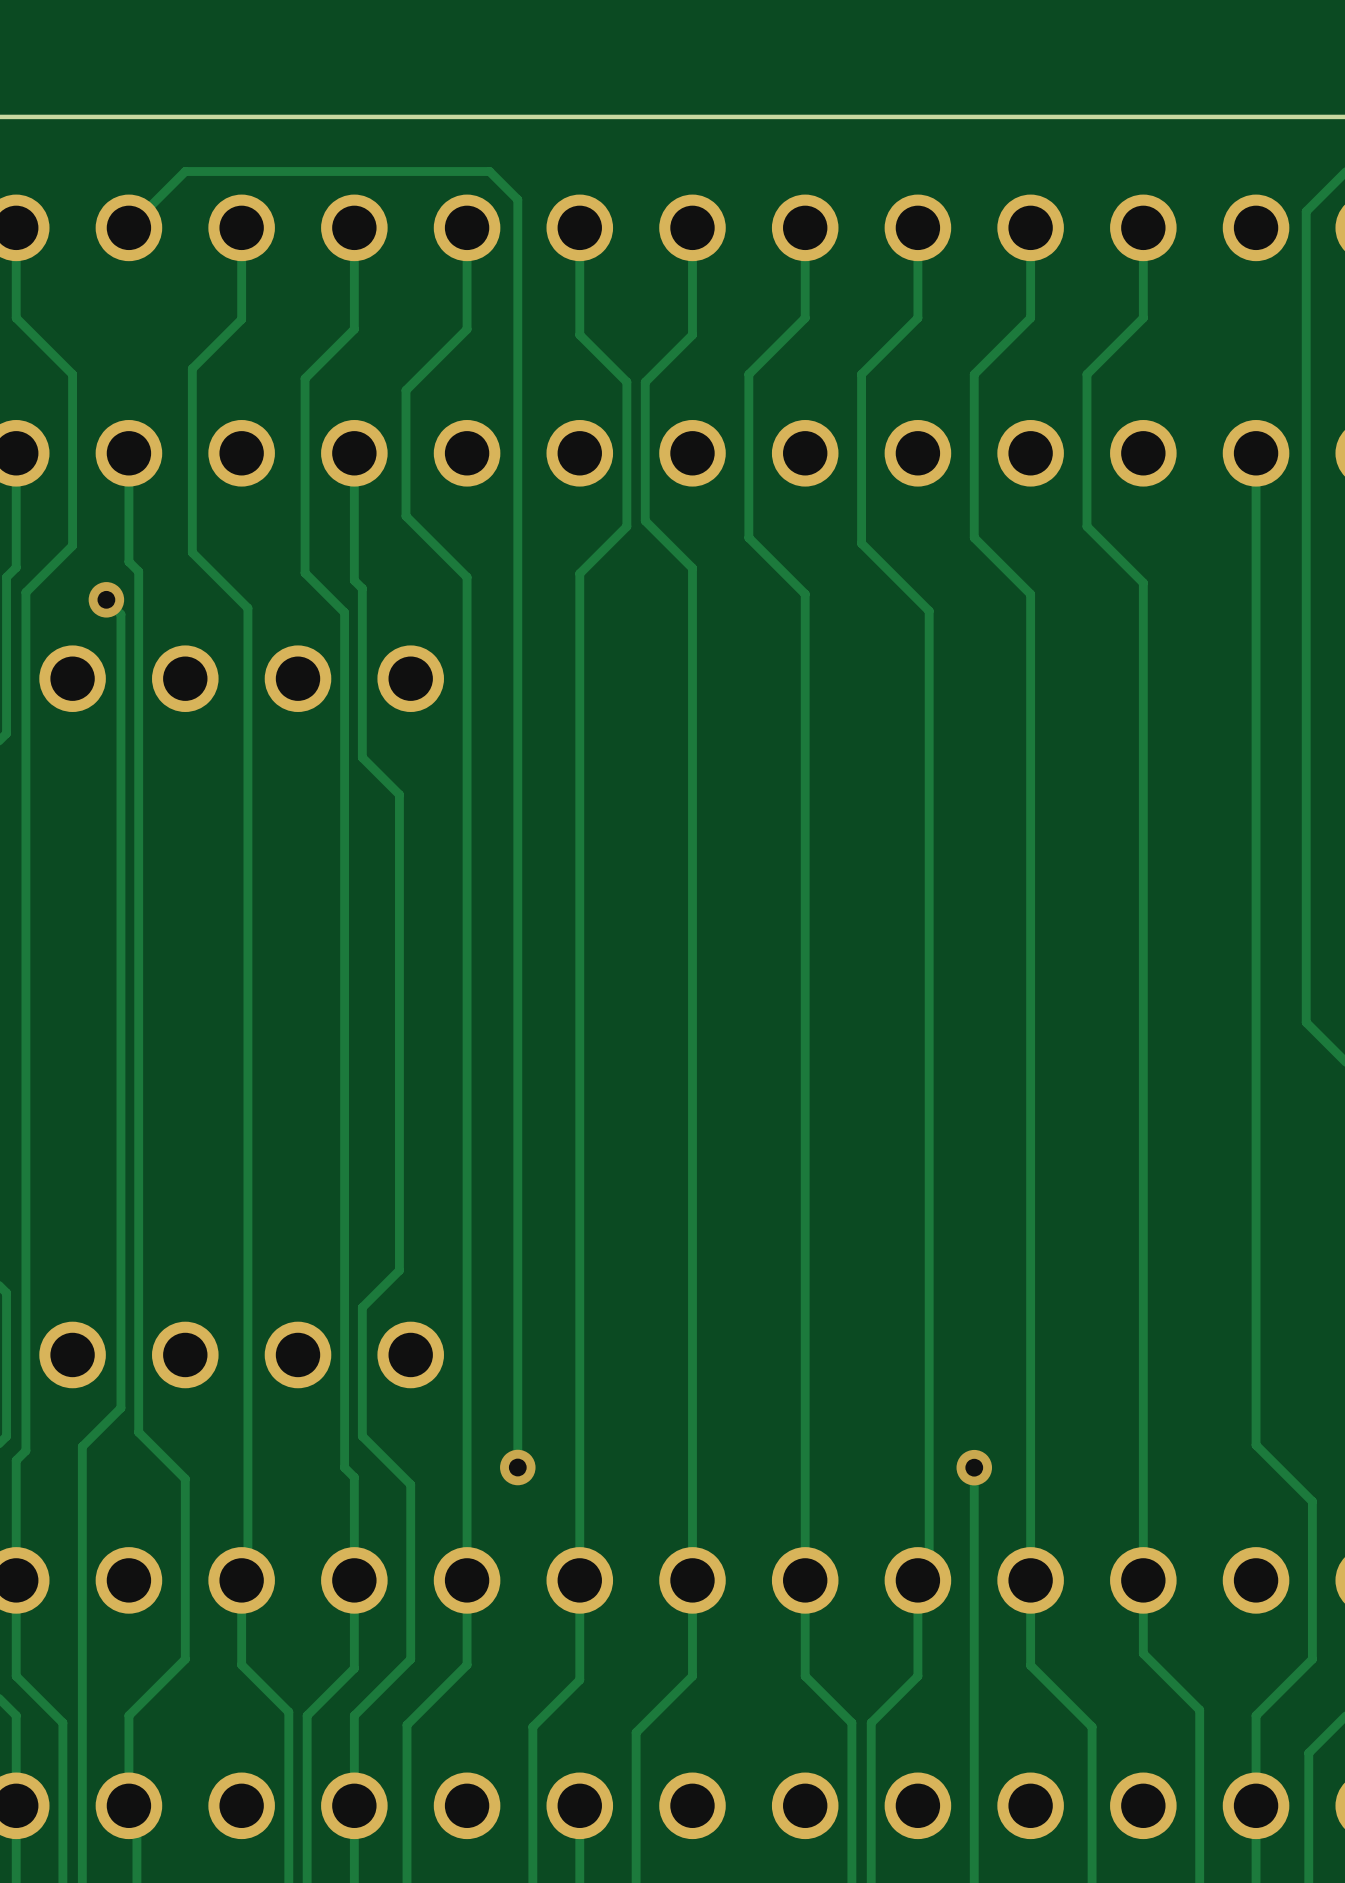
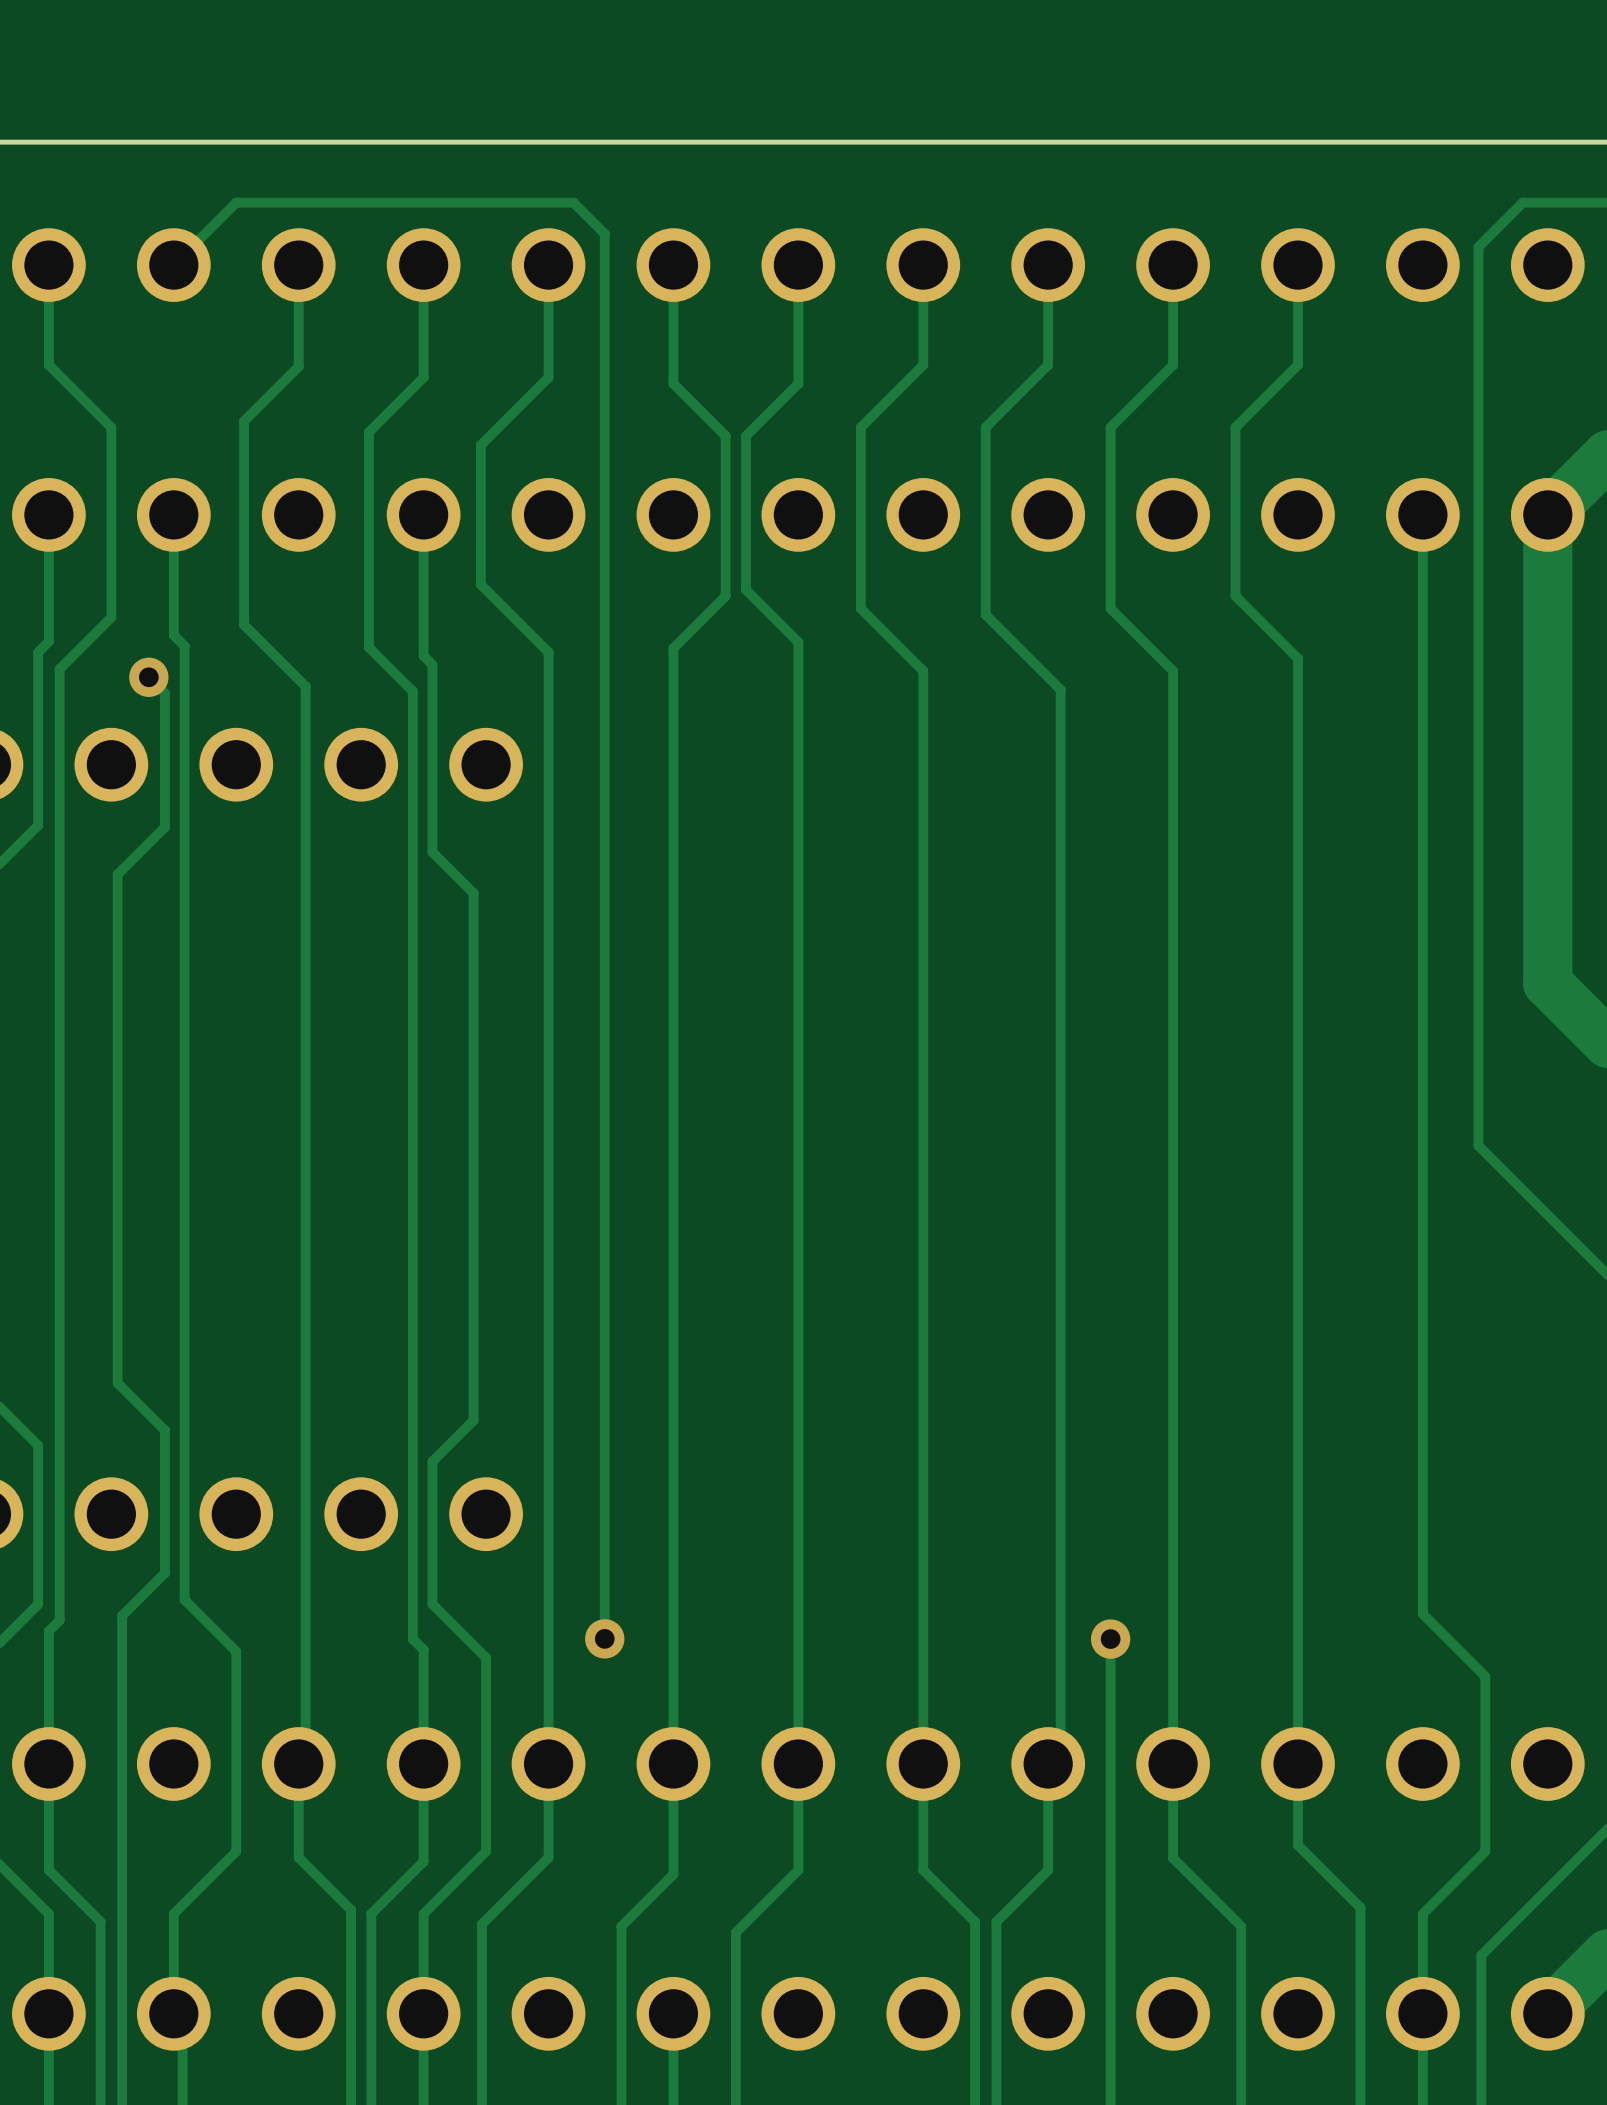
track: (120, 735) (120, 1279) -> (164, 827) (117, 874) (117, 1383) (164, 1430)

